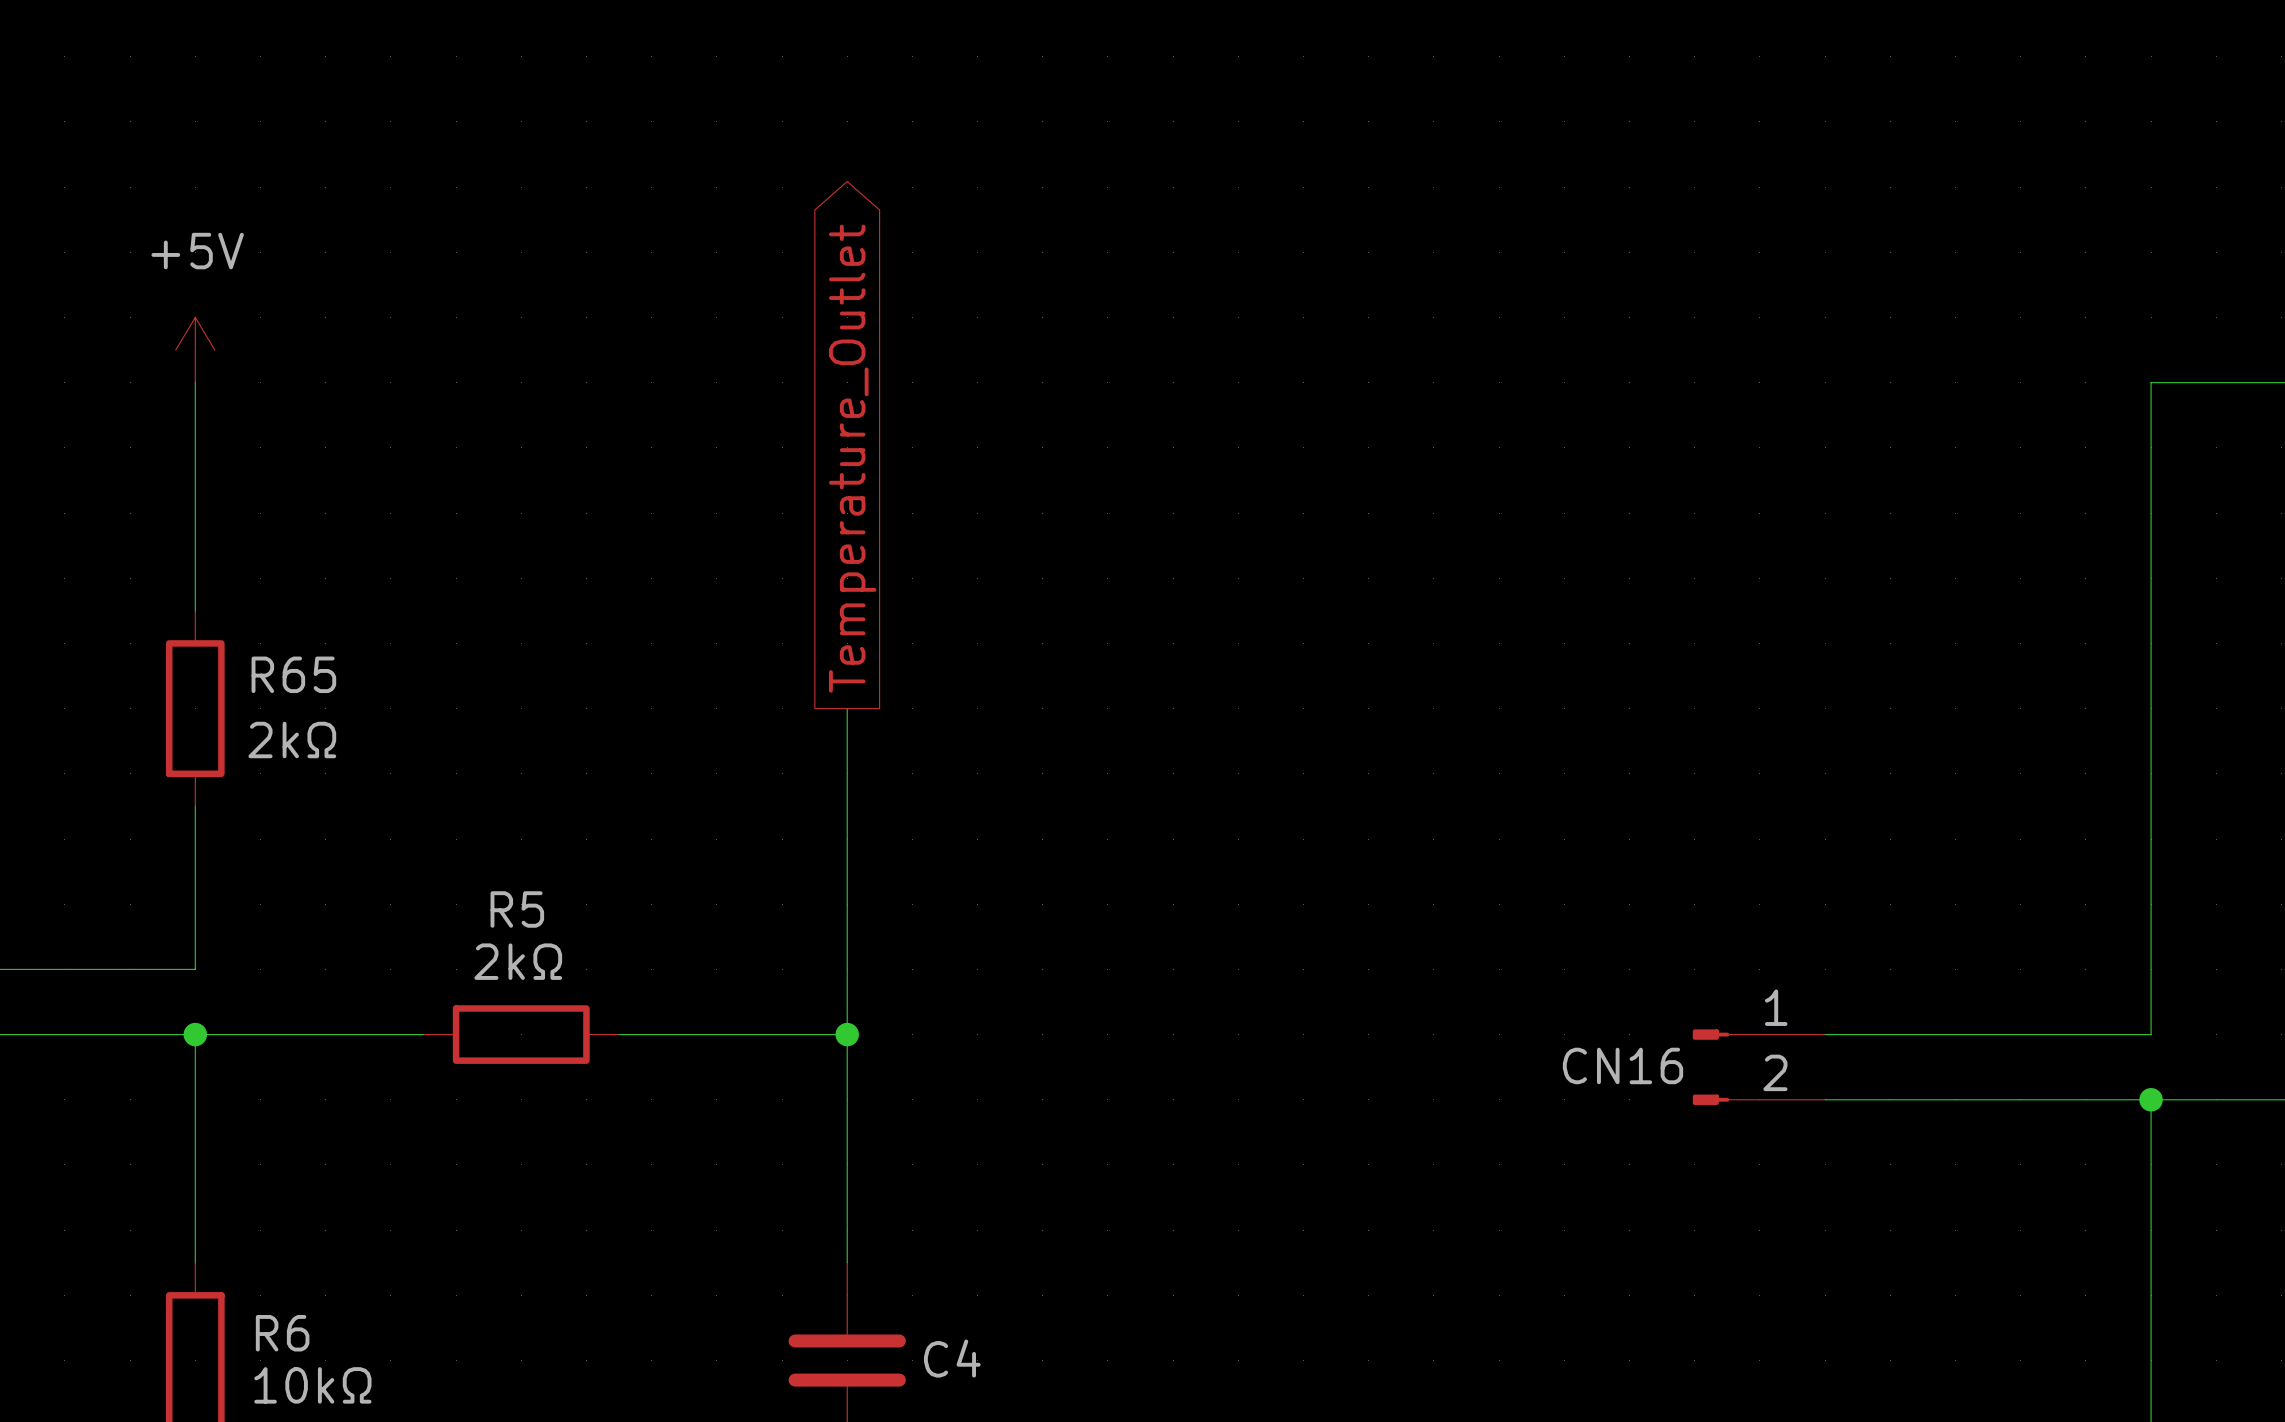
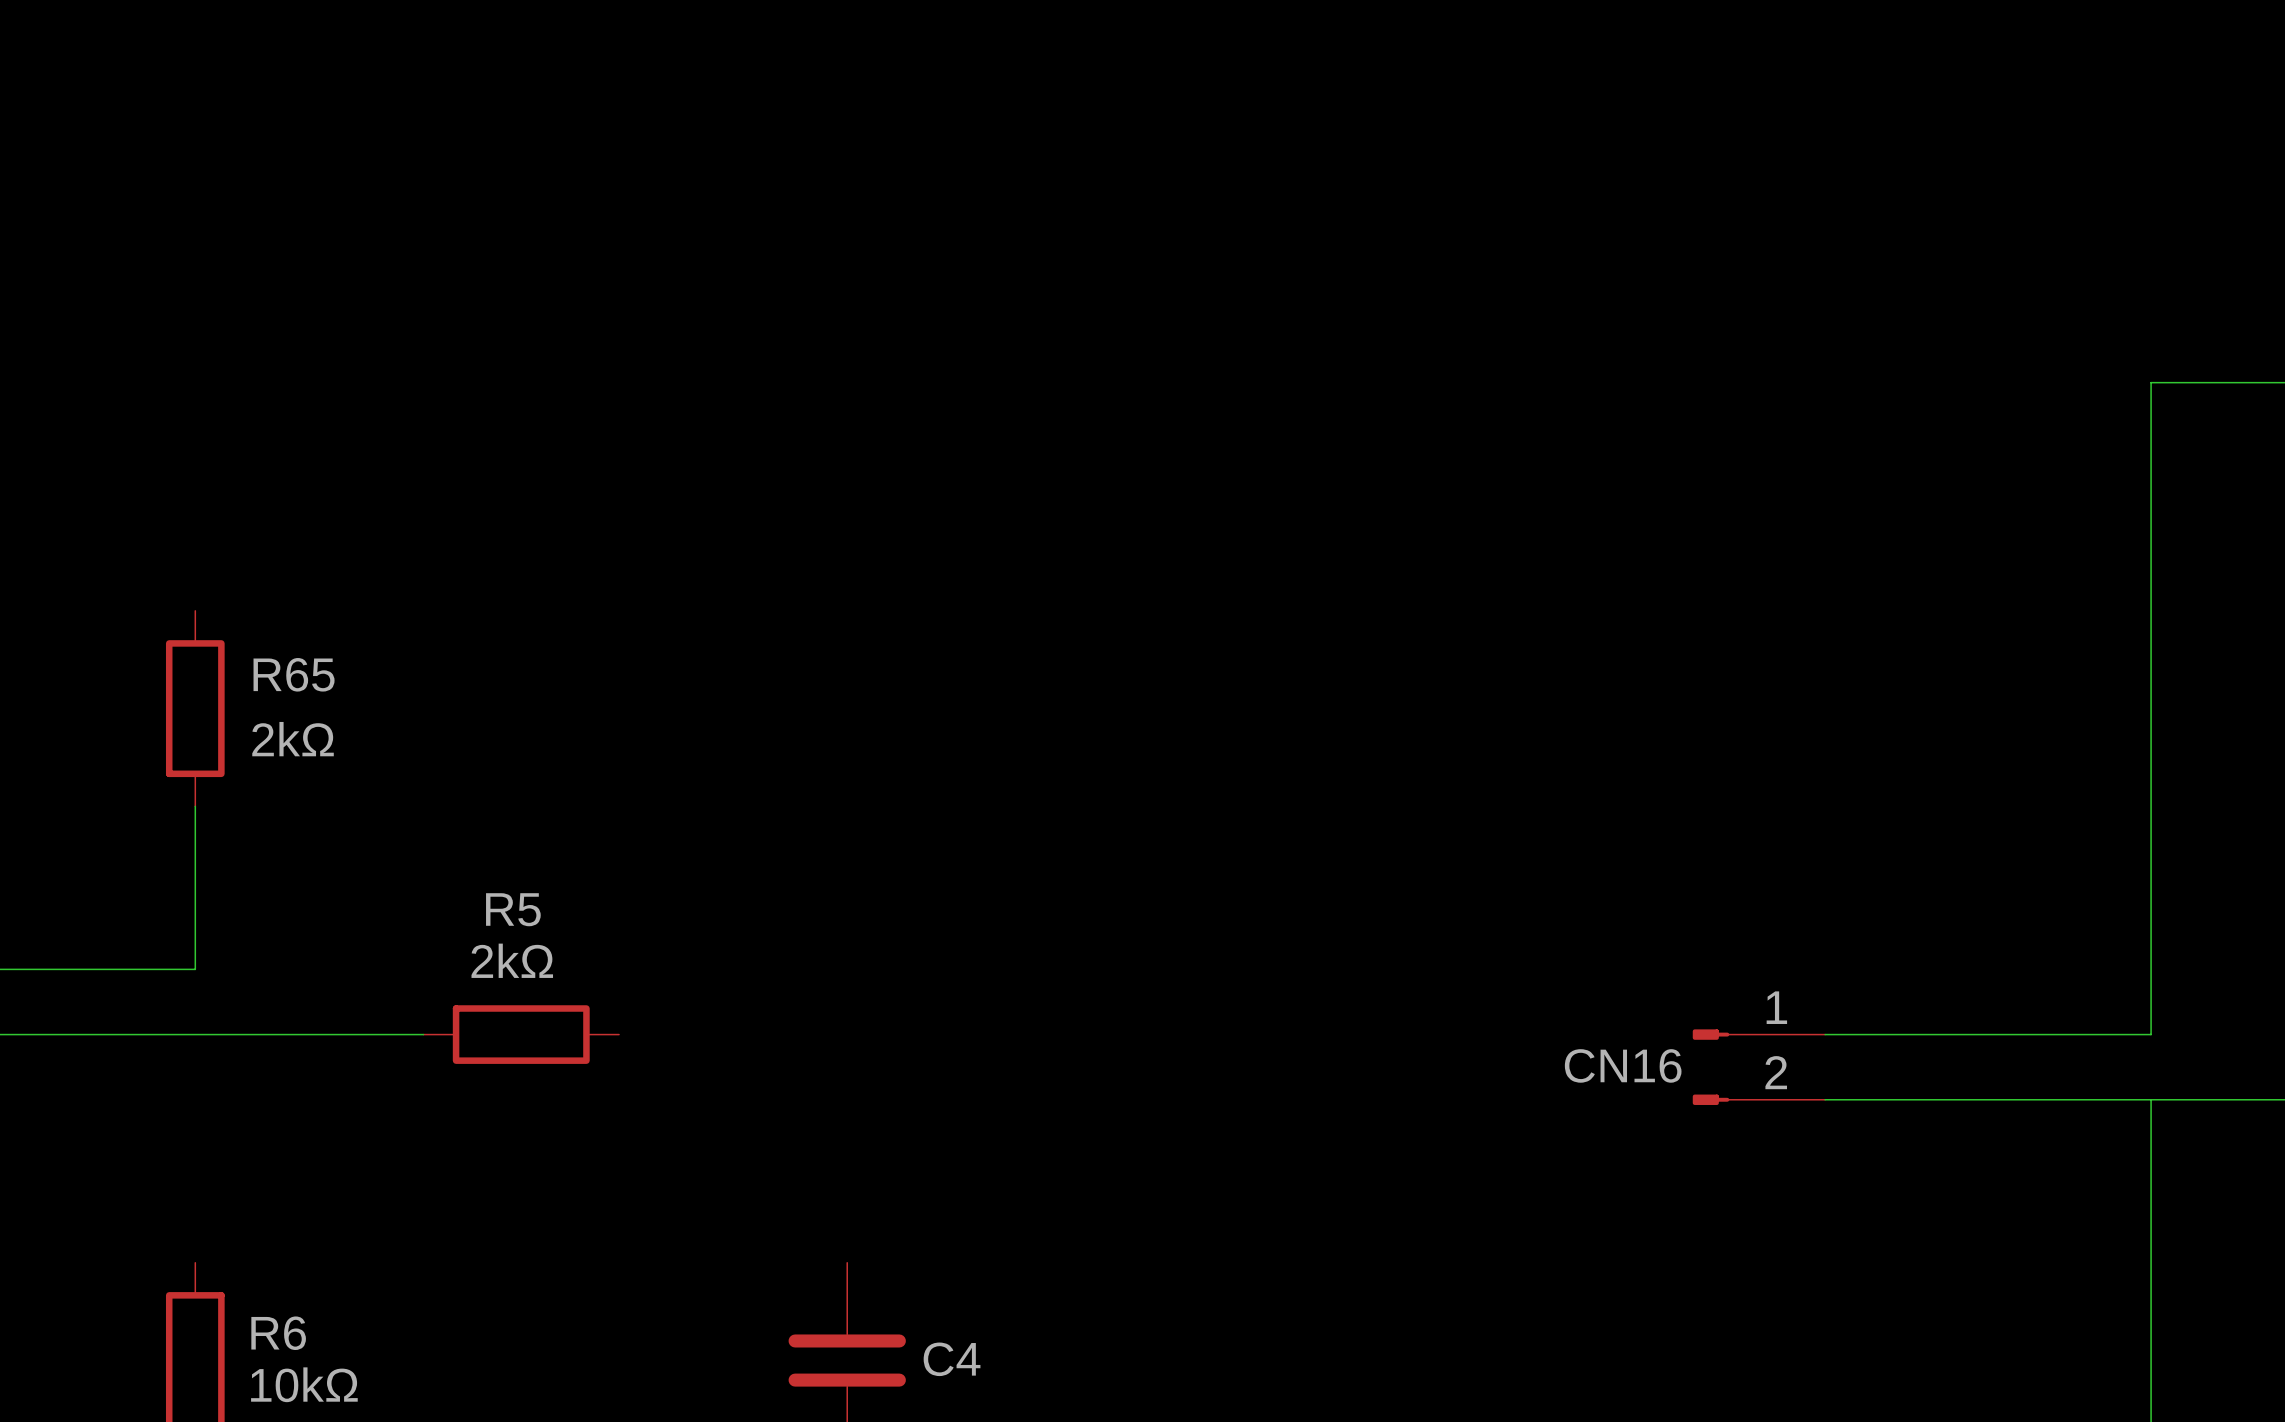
power symbol: +5V (195, 350) -> none
wire: (195, 382) (195, 610) -> none
global label: Temperature_Outlet (852, 458) -> none
wire: (847, 708) (847, 1262) -> none
wire: (195, 1034) (195, 1262) -> none
junction: (195, 1034) -> none
wire: (619, 1034) (847, 1034) -> none
junction: (847, 1034) -> none
junction: (2151, 1099) -> none

